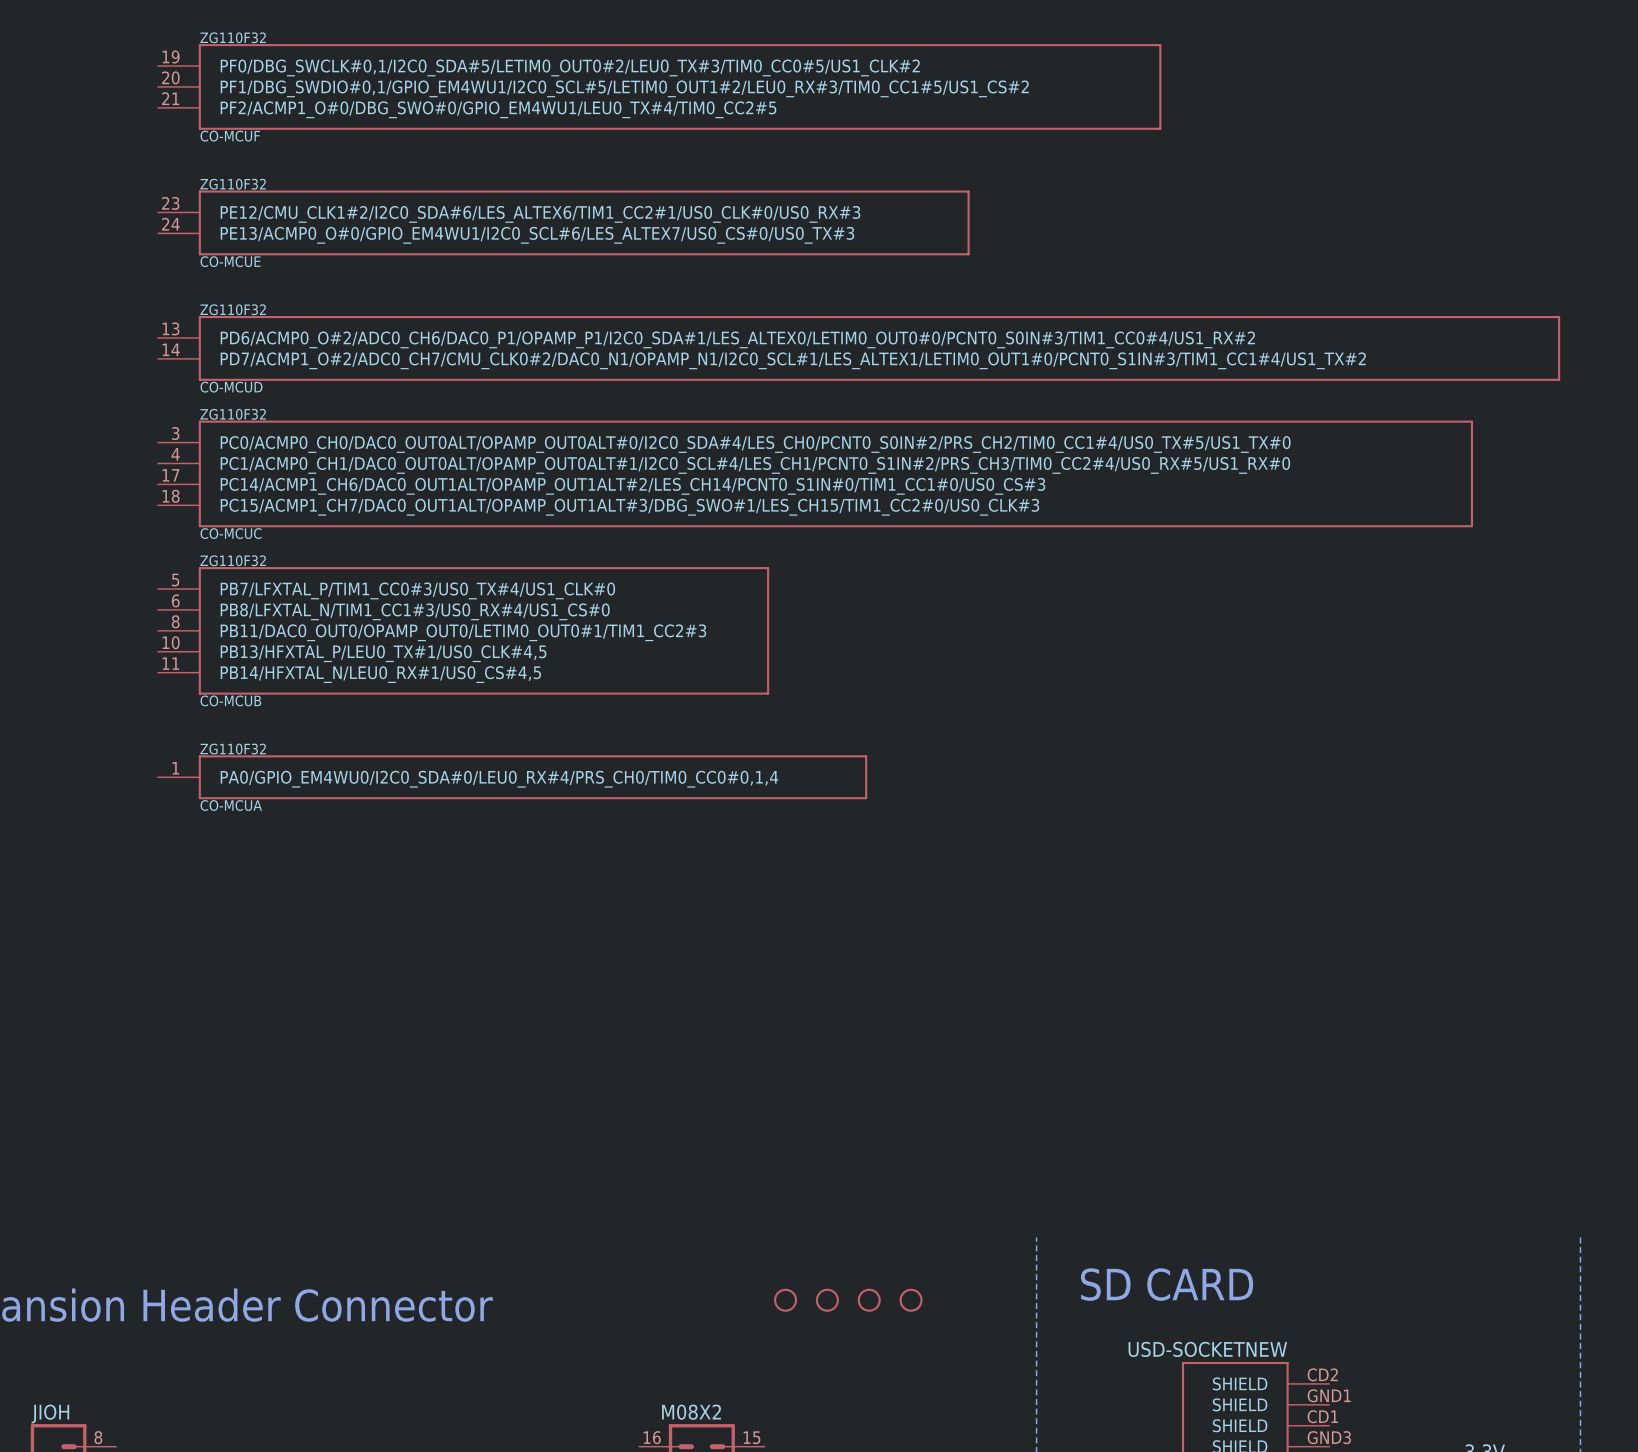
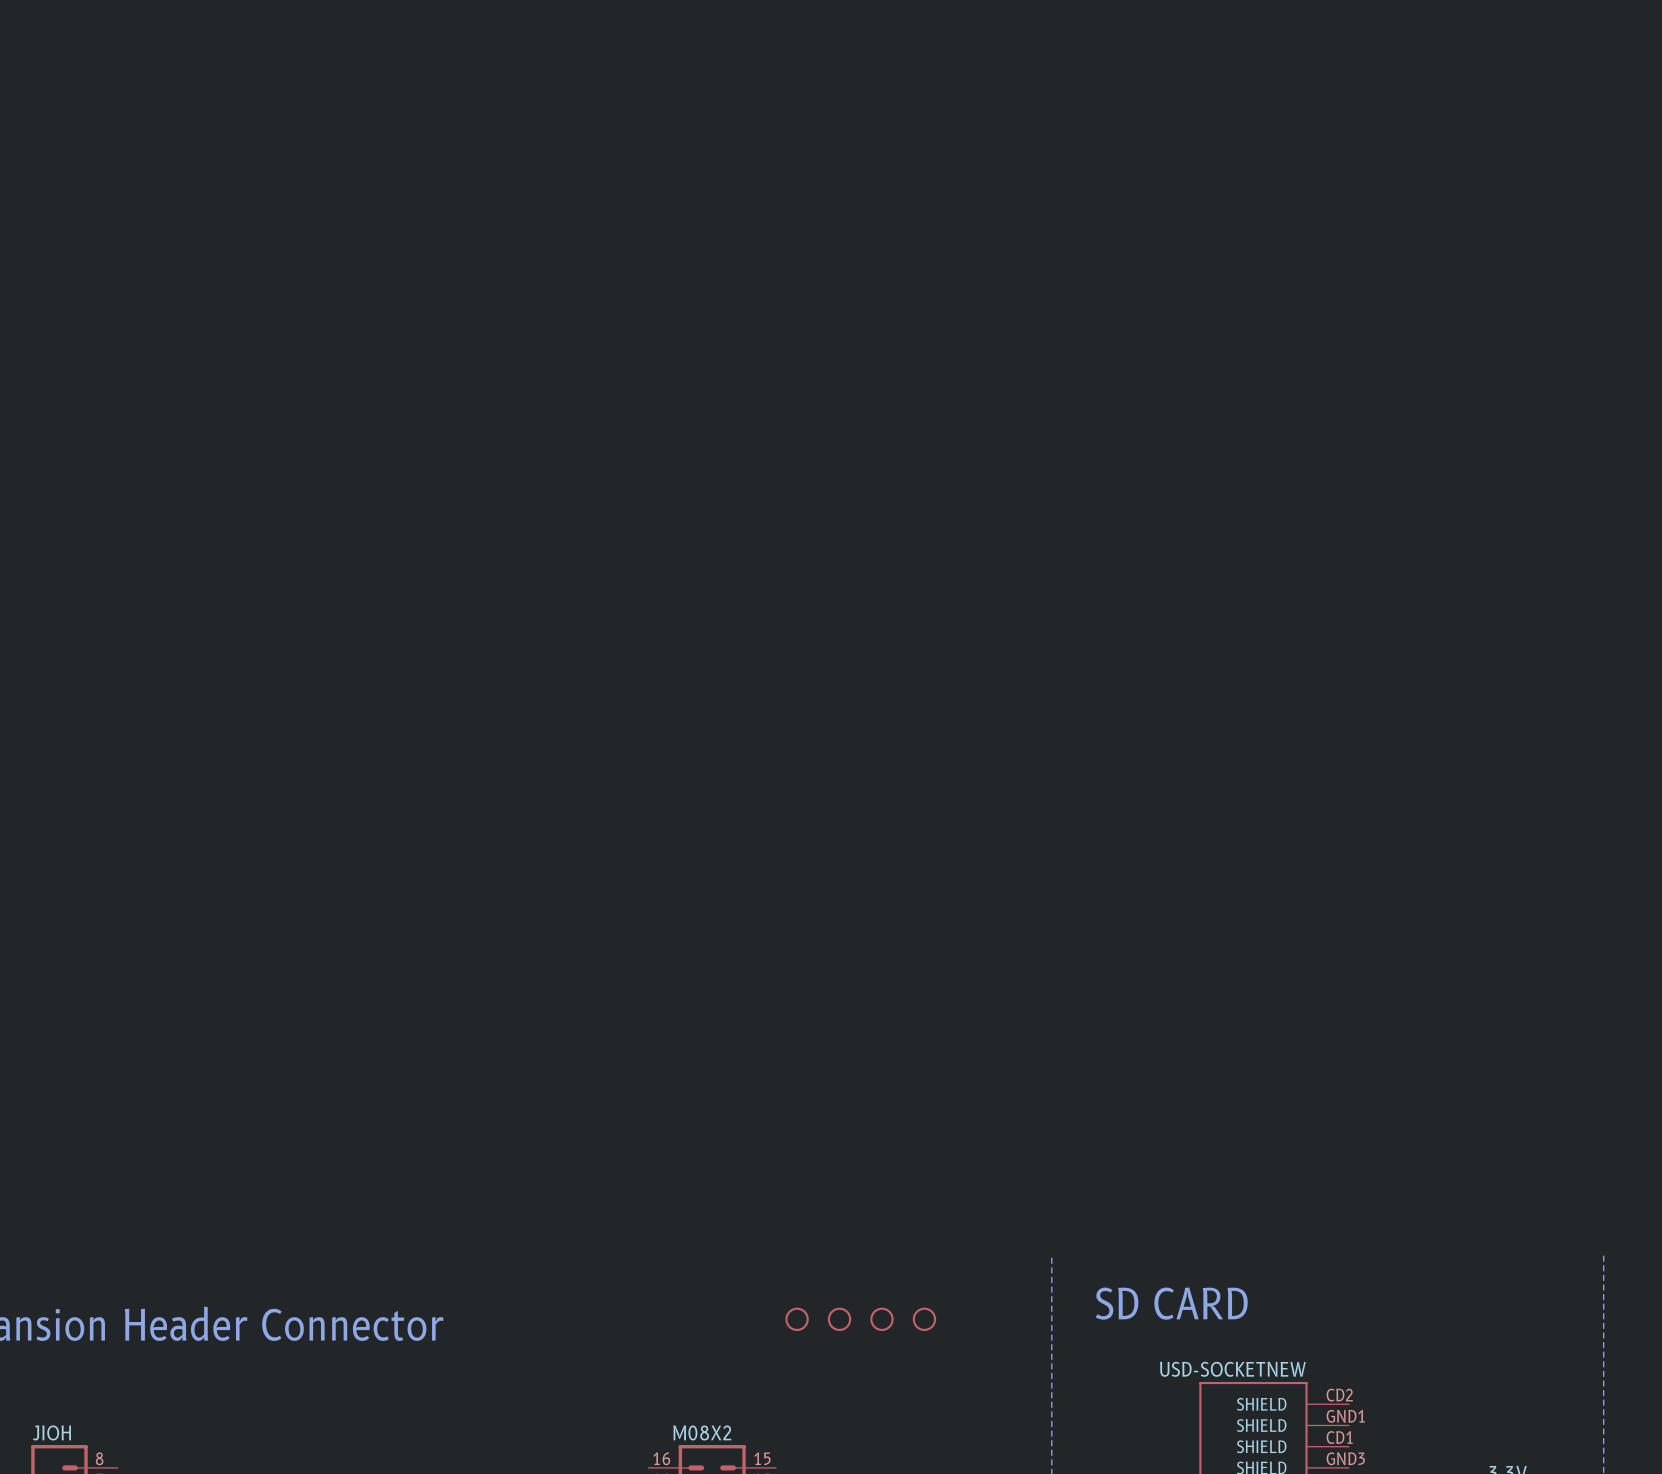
CO-MCUF: ZG110F32 (659, 86) -> none
CO-MCUE: ZG110F32 (563, 222) -> none
CO-MCUD: ZG110F32 (859, 348) -> none
CO-MCUC: ZG110F32 (815, 473) -> none
CO-MCUB: ZG110F32 (463, 630) -> none
CO-MCUA: ZG110F32 (512, 777) -> none

